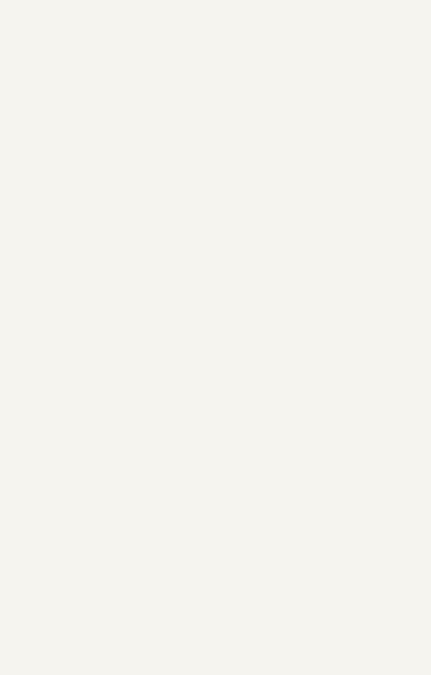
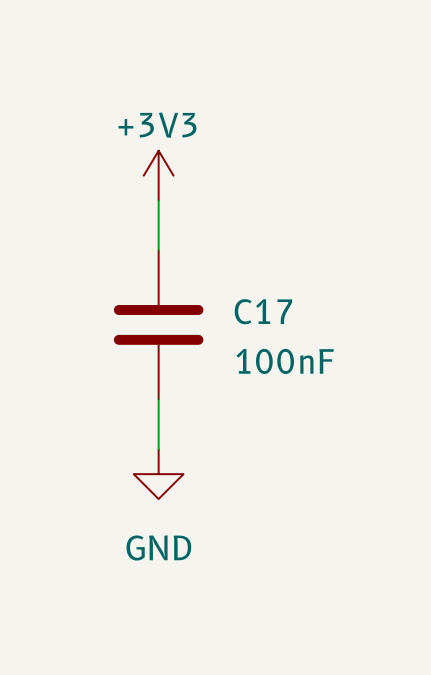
power symbol: none -> +3V3 (158, 175)
wire: none -> (158, 200) (158, 250)
C17: none -> 100nF (158, 324)
wire: none -> (158, 399) (158, 449)
power symbol: none -> GND (158, 474)

